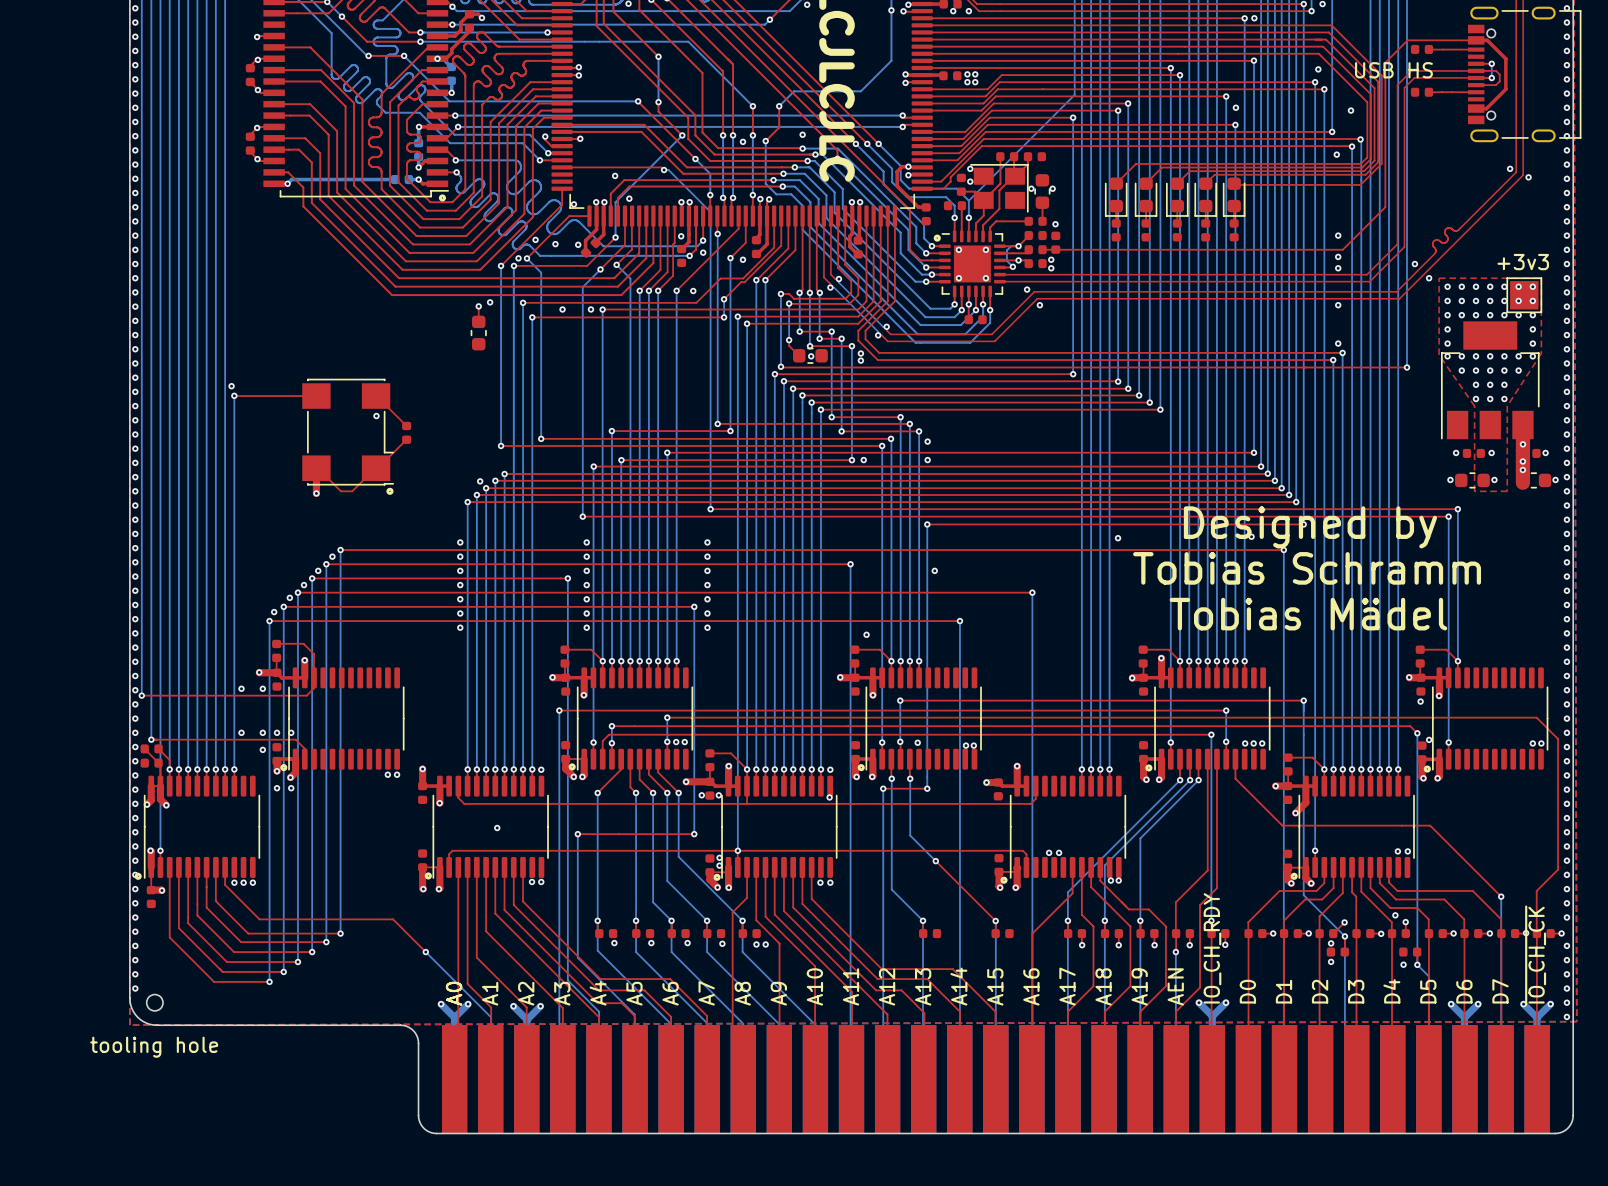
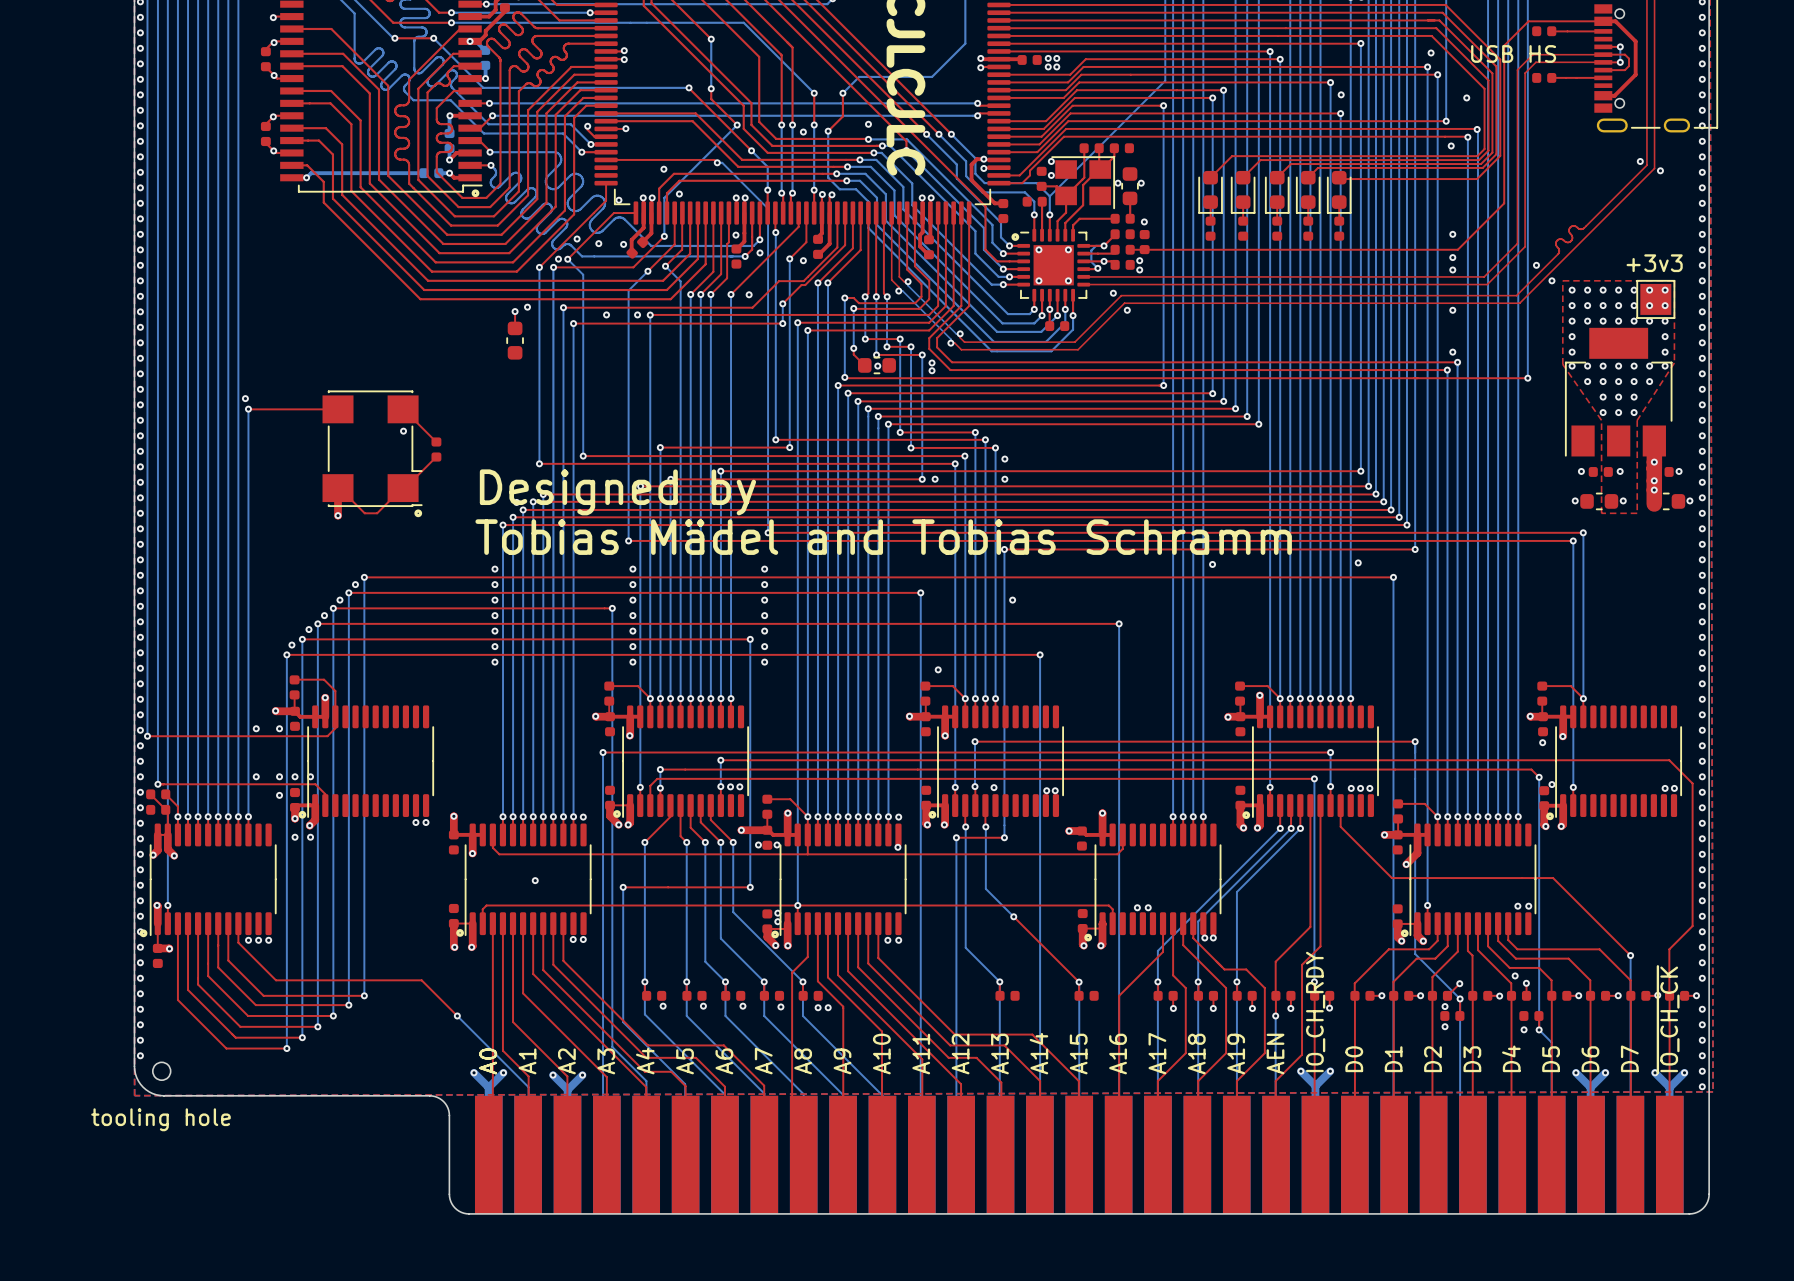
text: none -> Designed by (617, 492)
text: none -> Tobias Mädel and Tobias Schramm (883, 537)
text: Designed by (1310, 527) -> none
text: Tobias Schramm (1307, 568) -> none
text: Tobias Mädel (1308, 614) -> none

